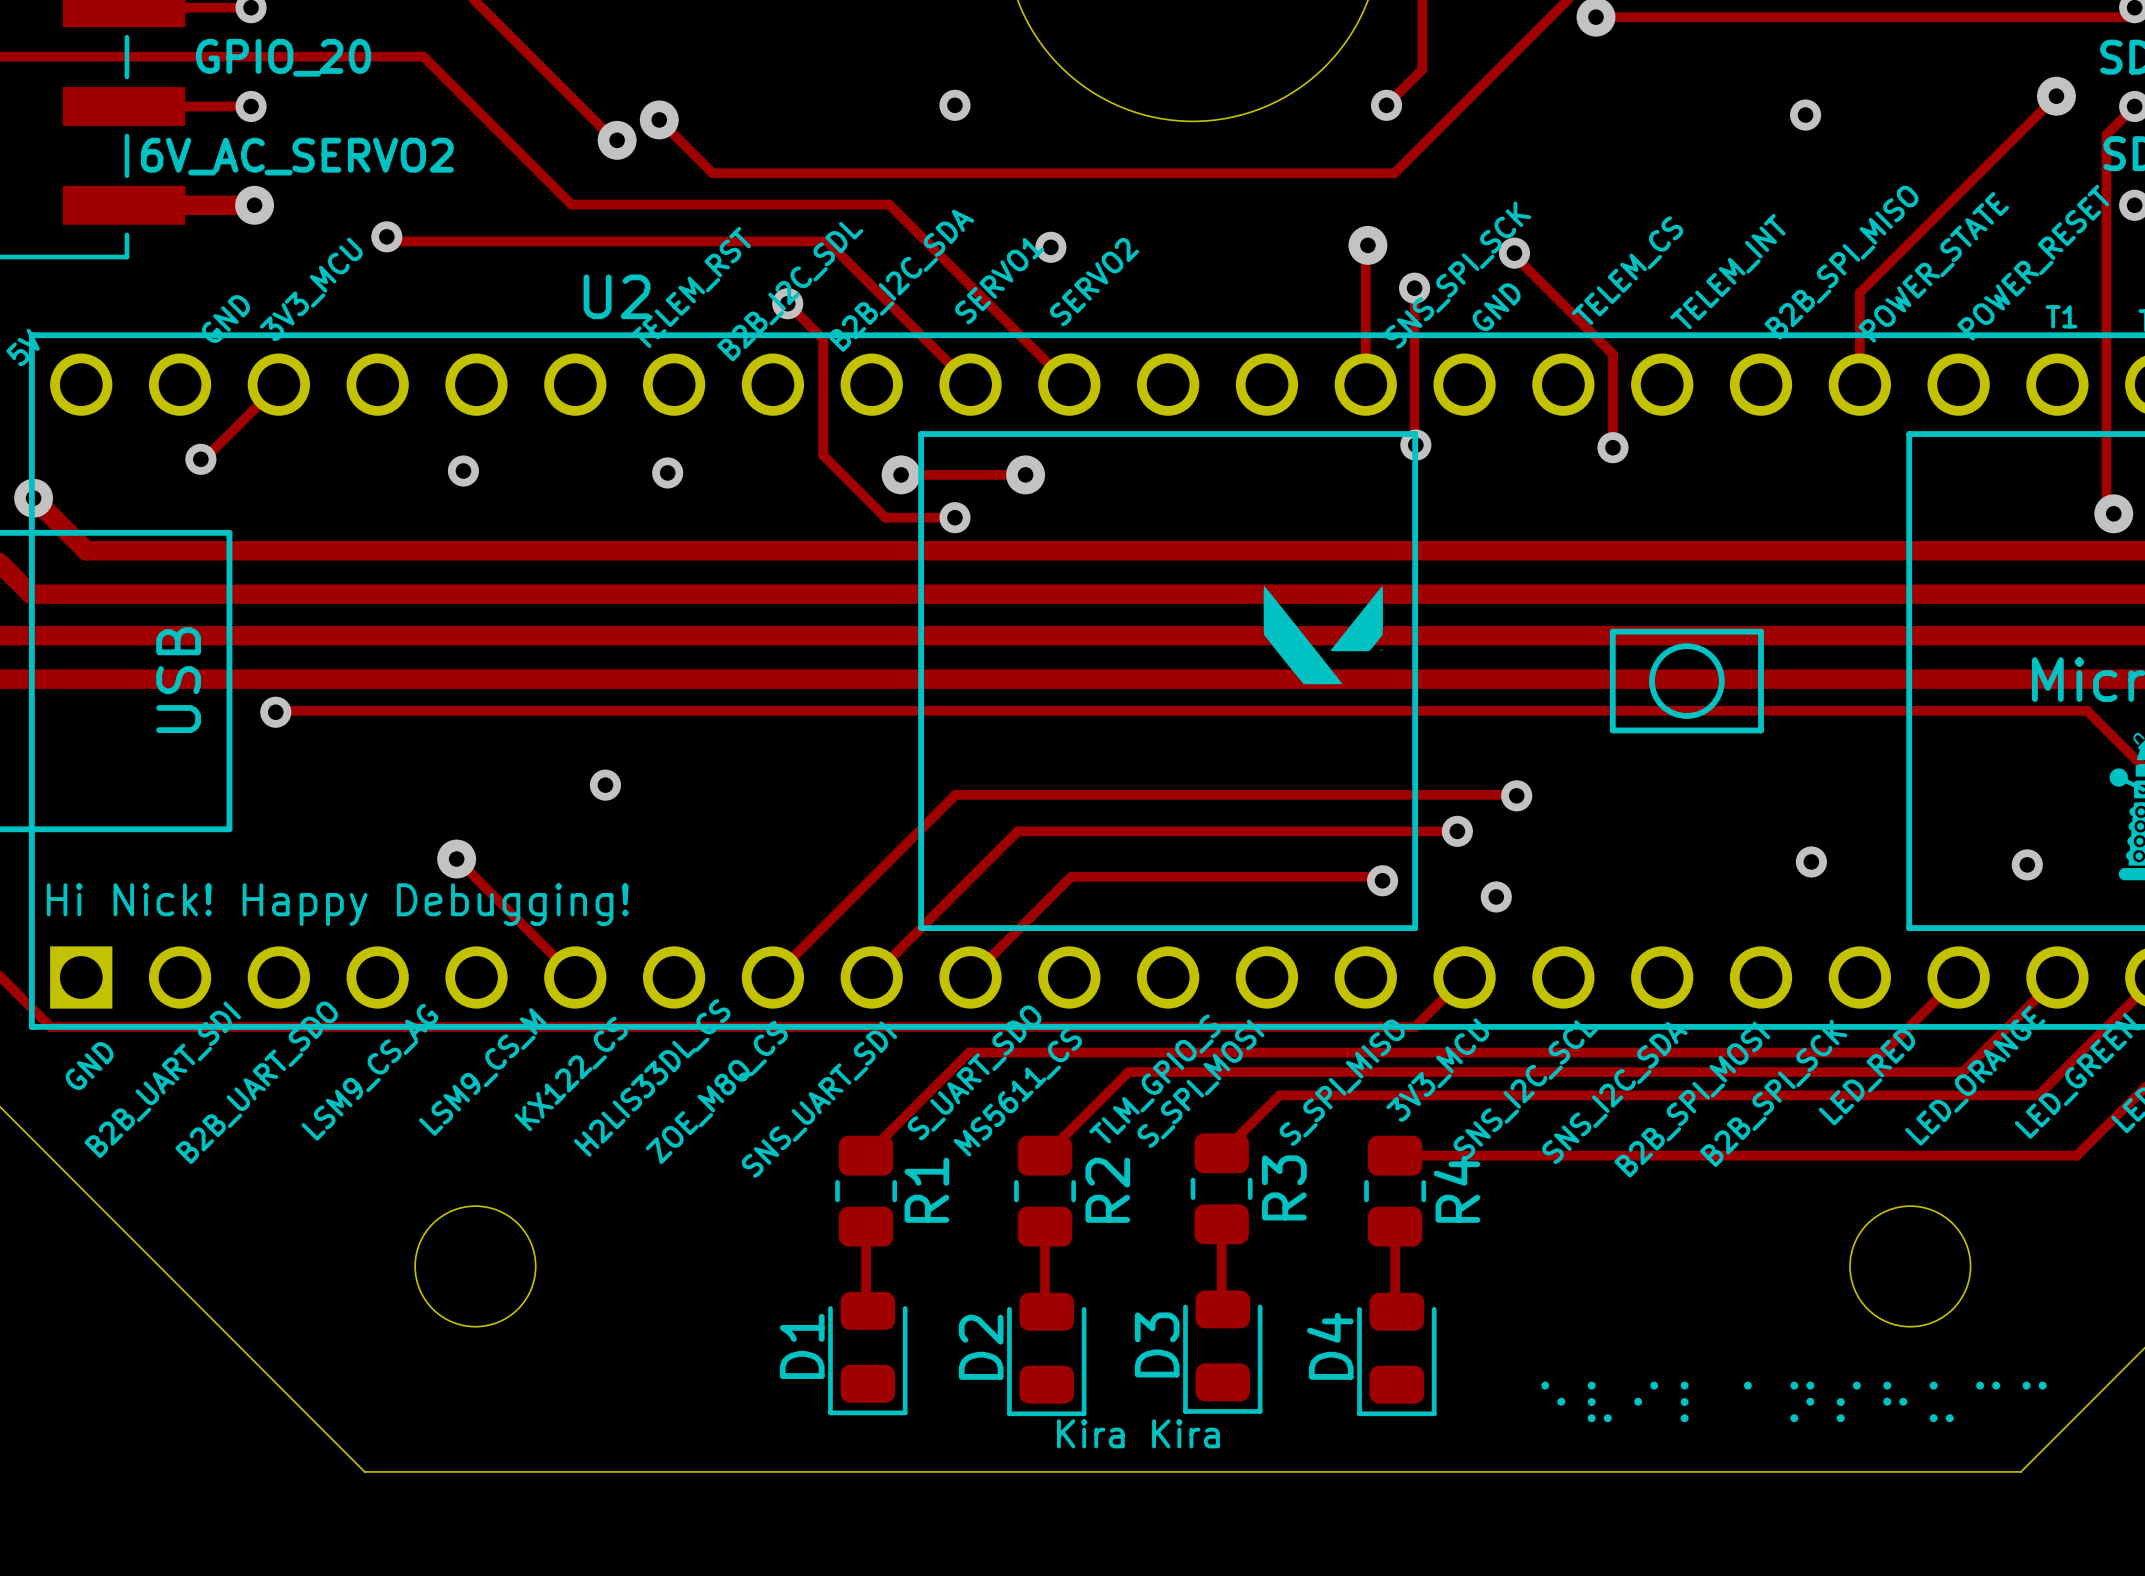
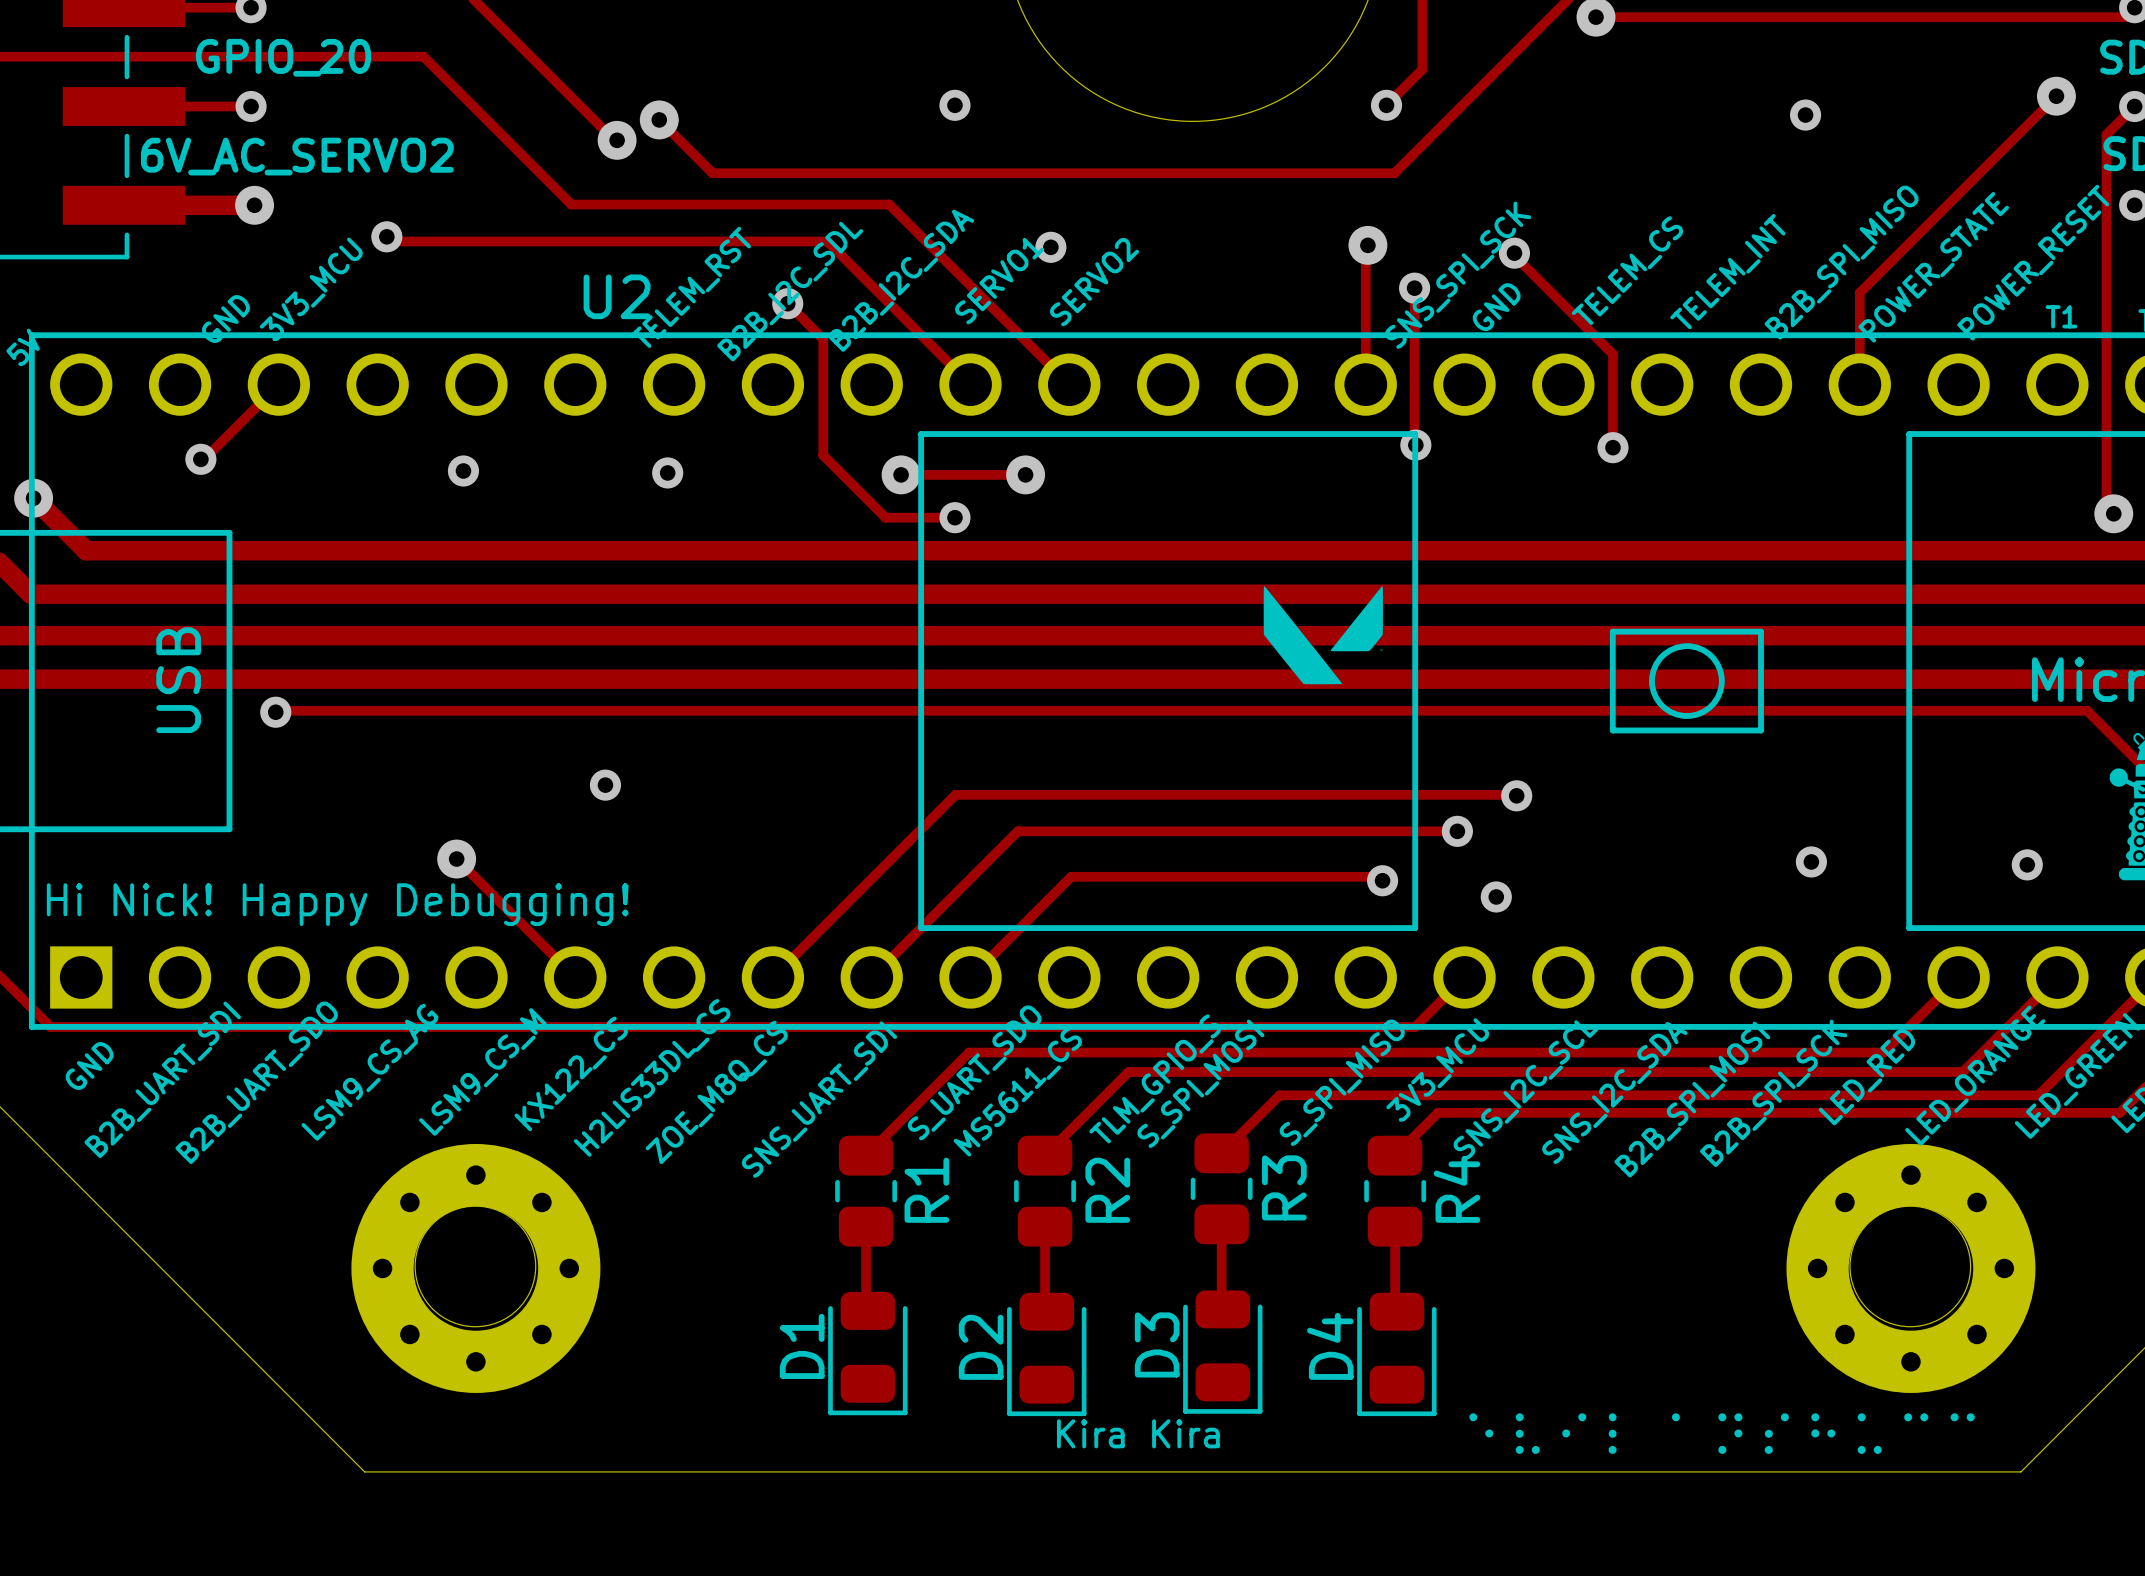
track: (2119, 1112) (2076, 1155) (1395, 1155) -> (2119, 1112) (1437, 1112) (1395, 1155)
part: none -> (475, 1268)
part: none -> (1910, 1268)
drawing position: (1794, 1401) -> (1722, 1433)

